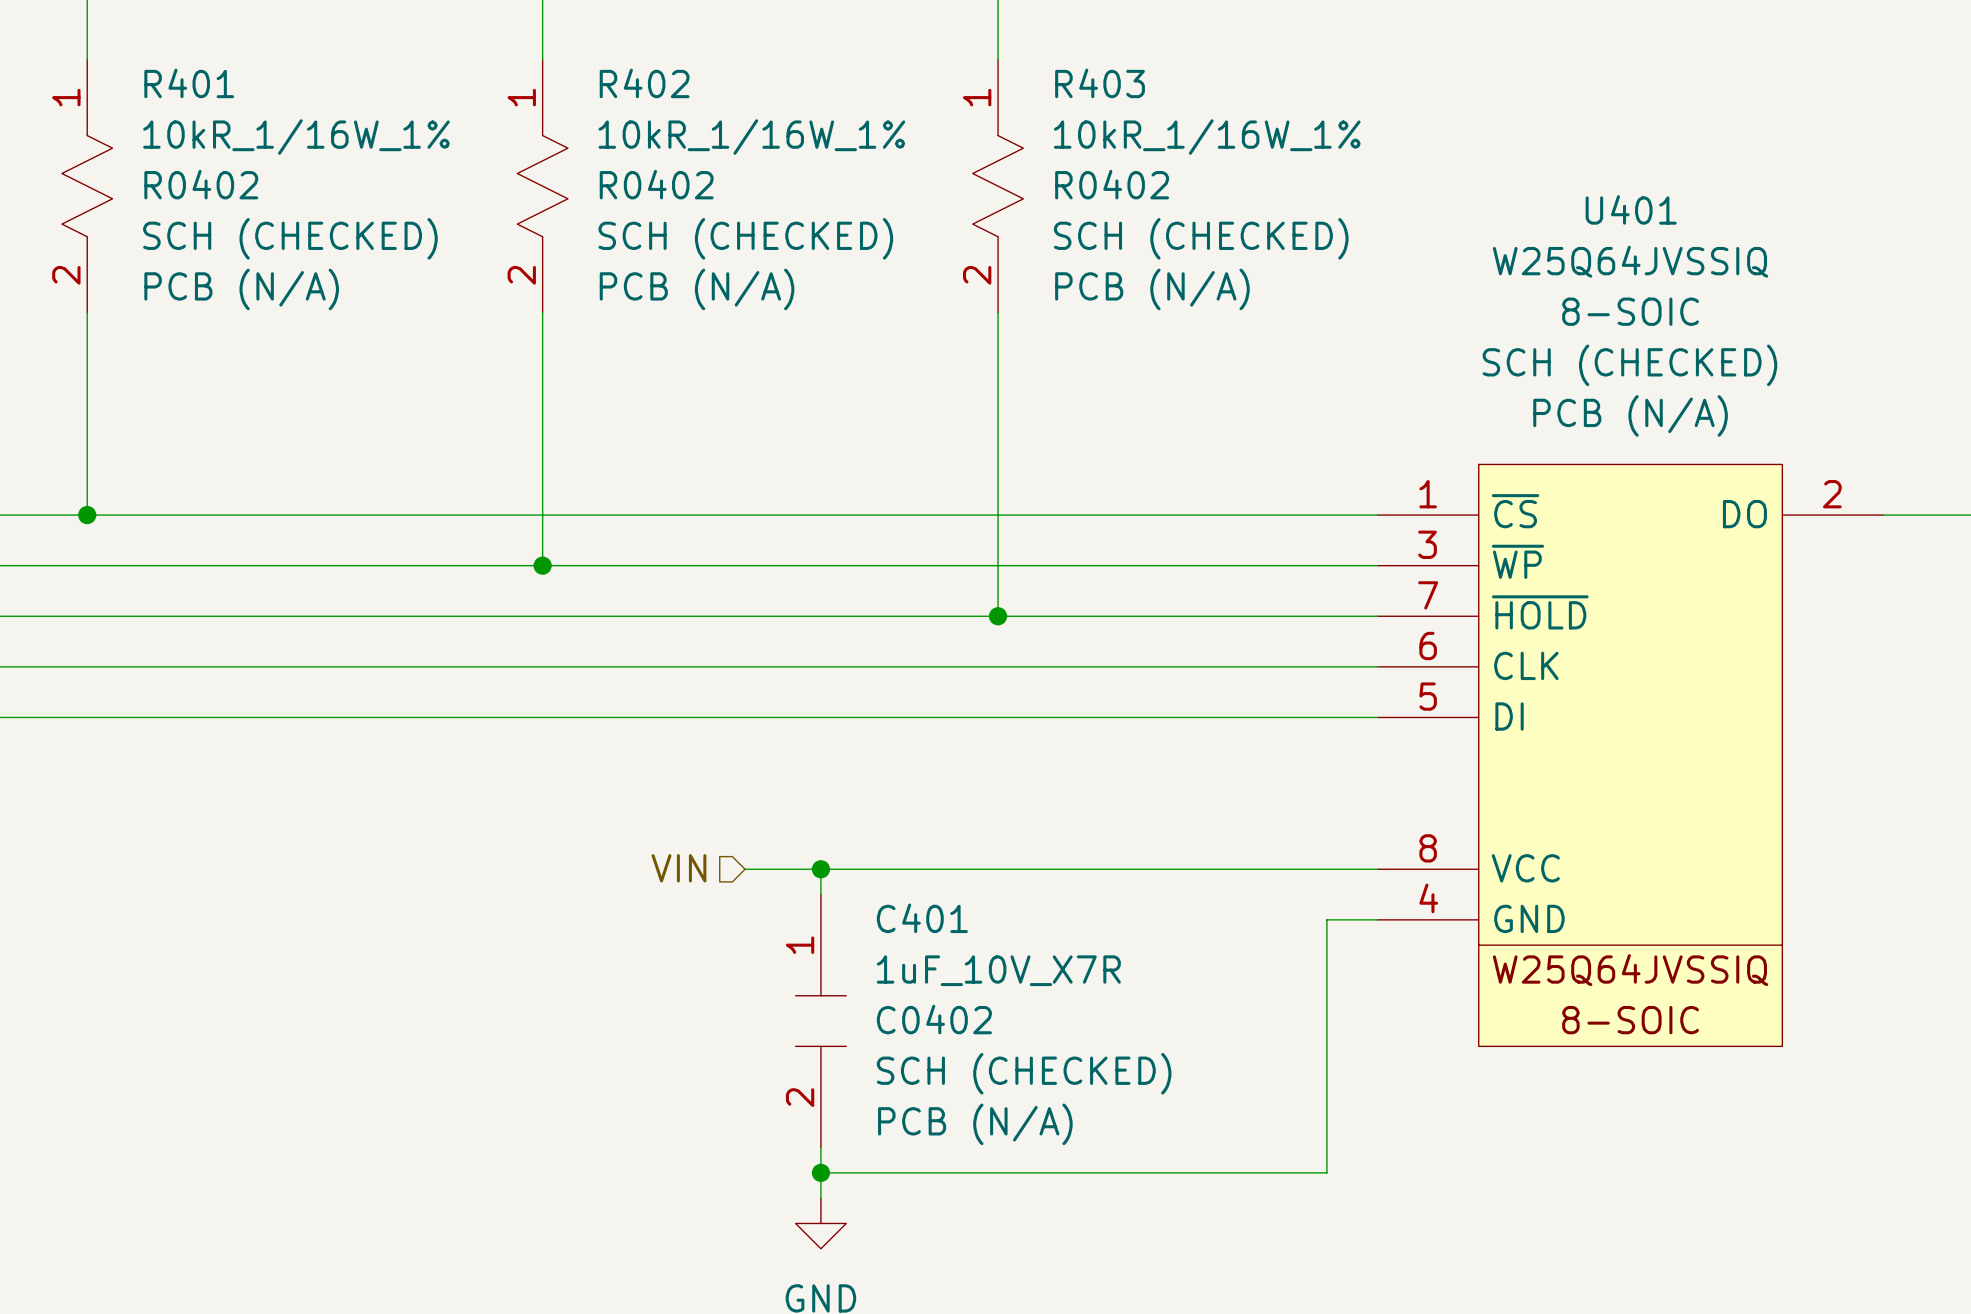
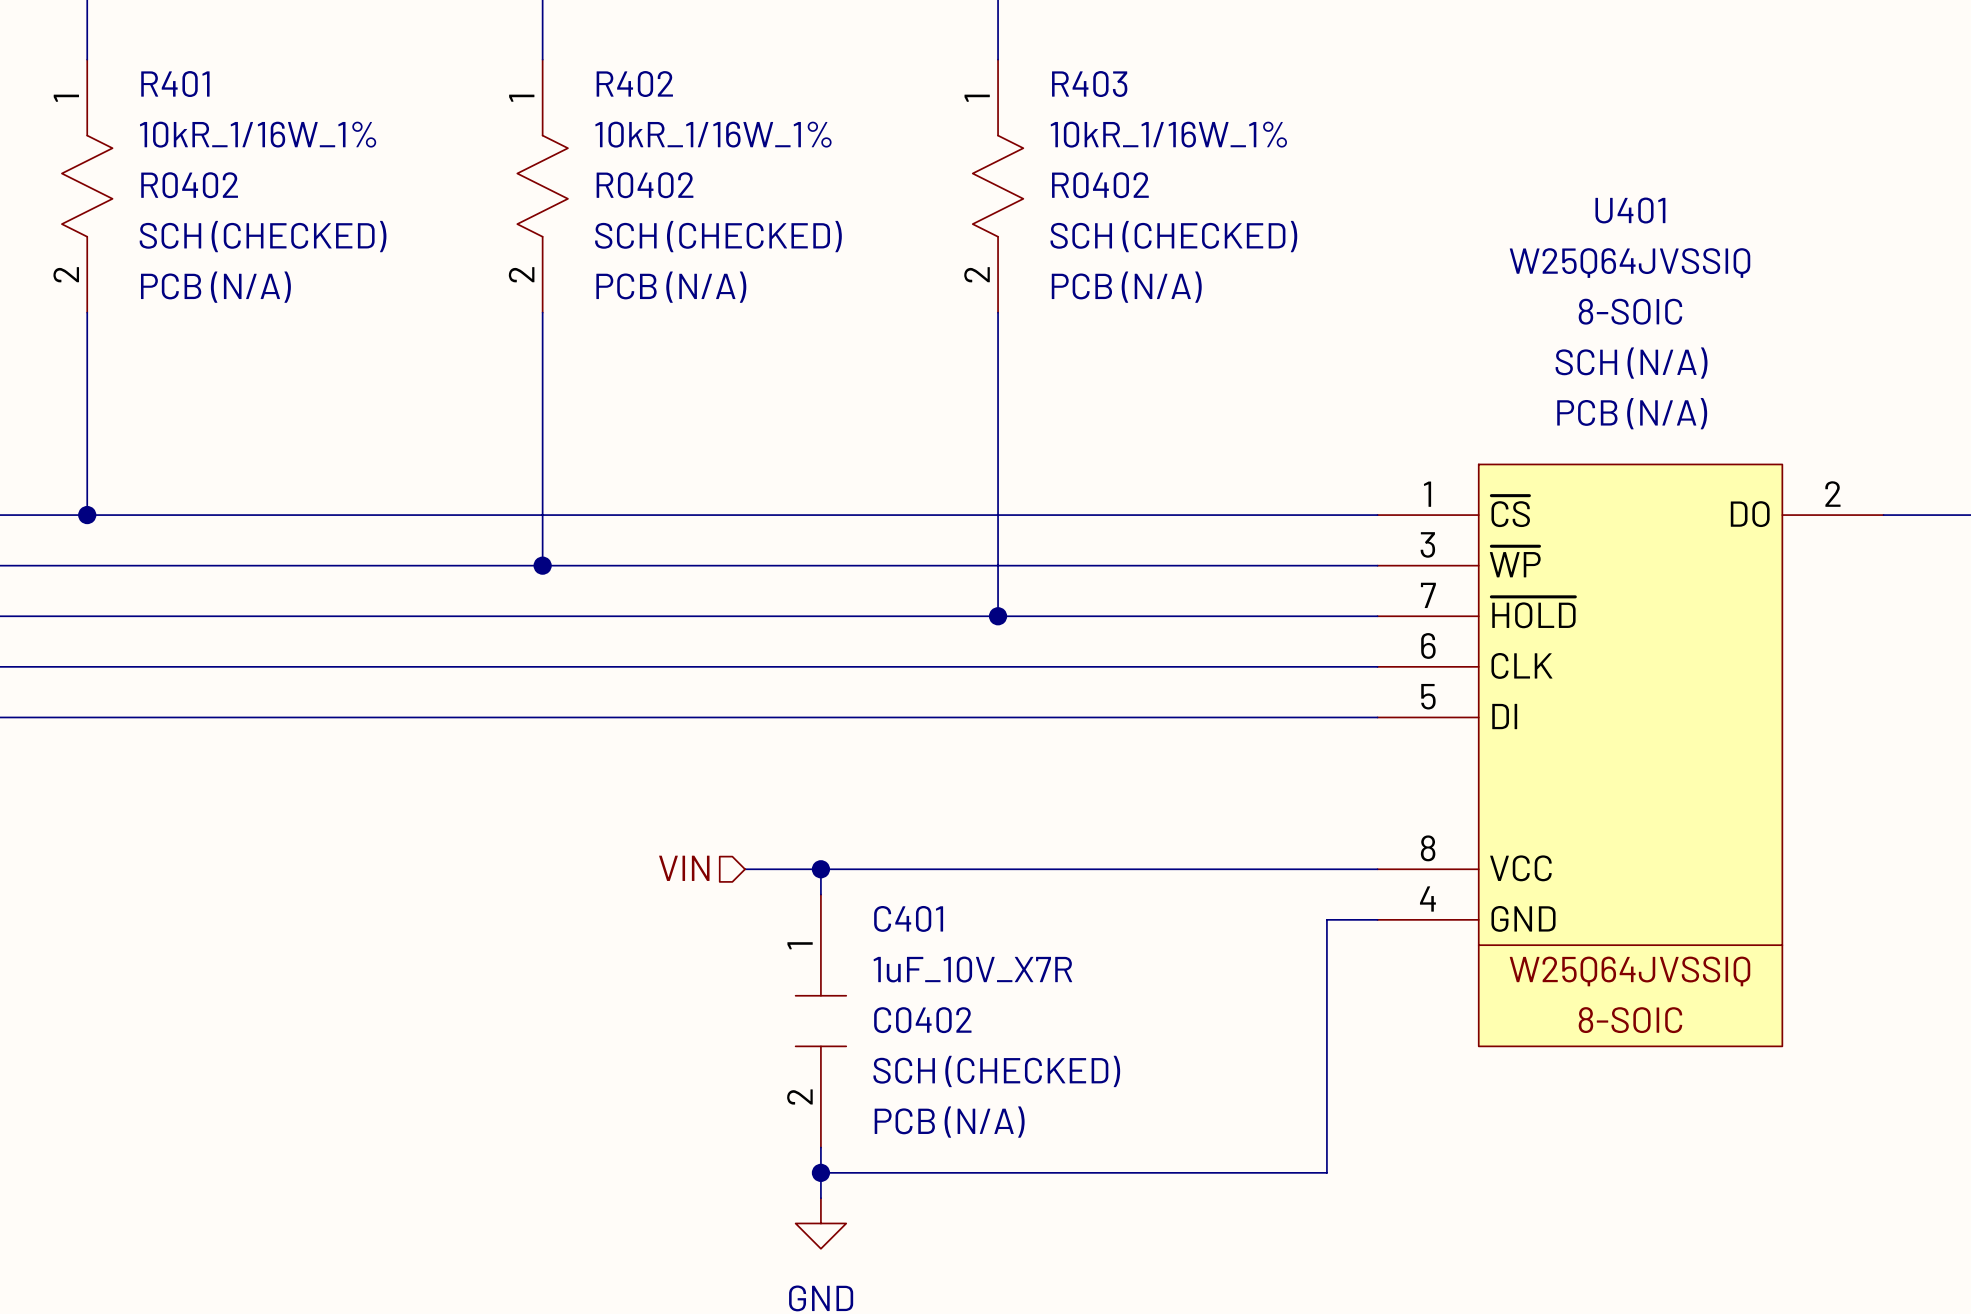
U401 text: SCH (CHECKED) (1629, 365) -> SCH (N/A) (1631, 363)

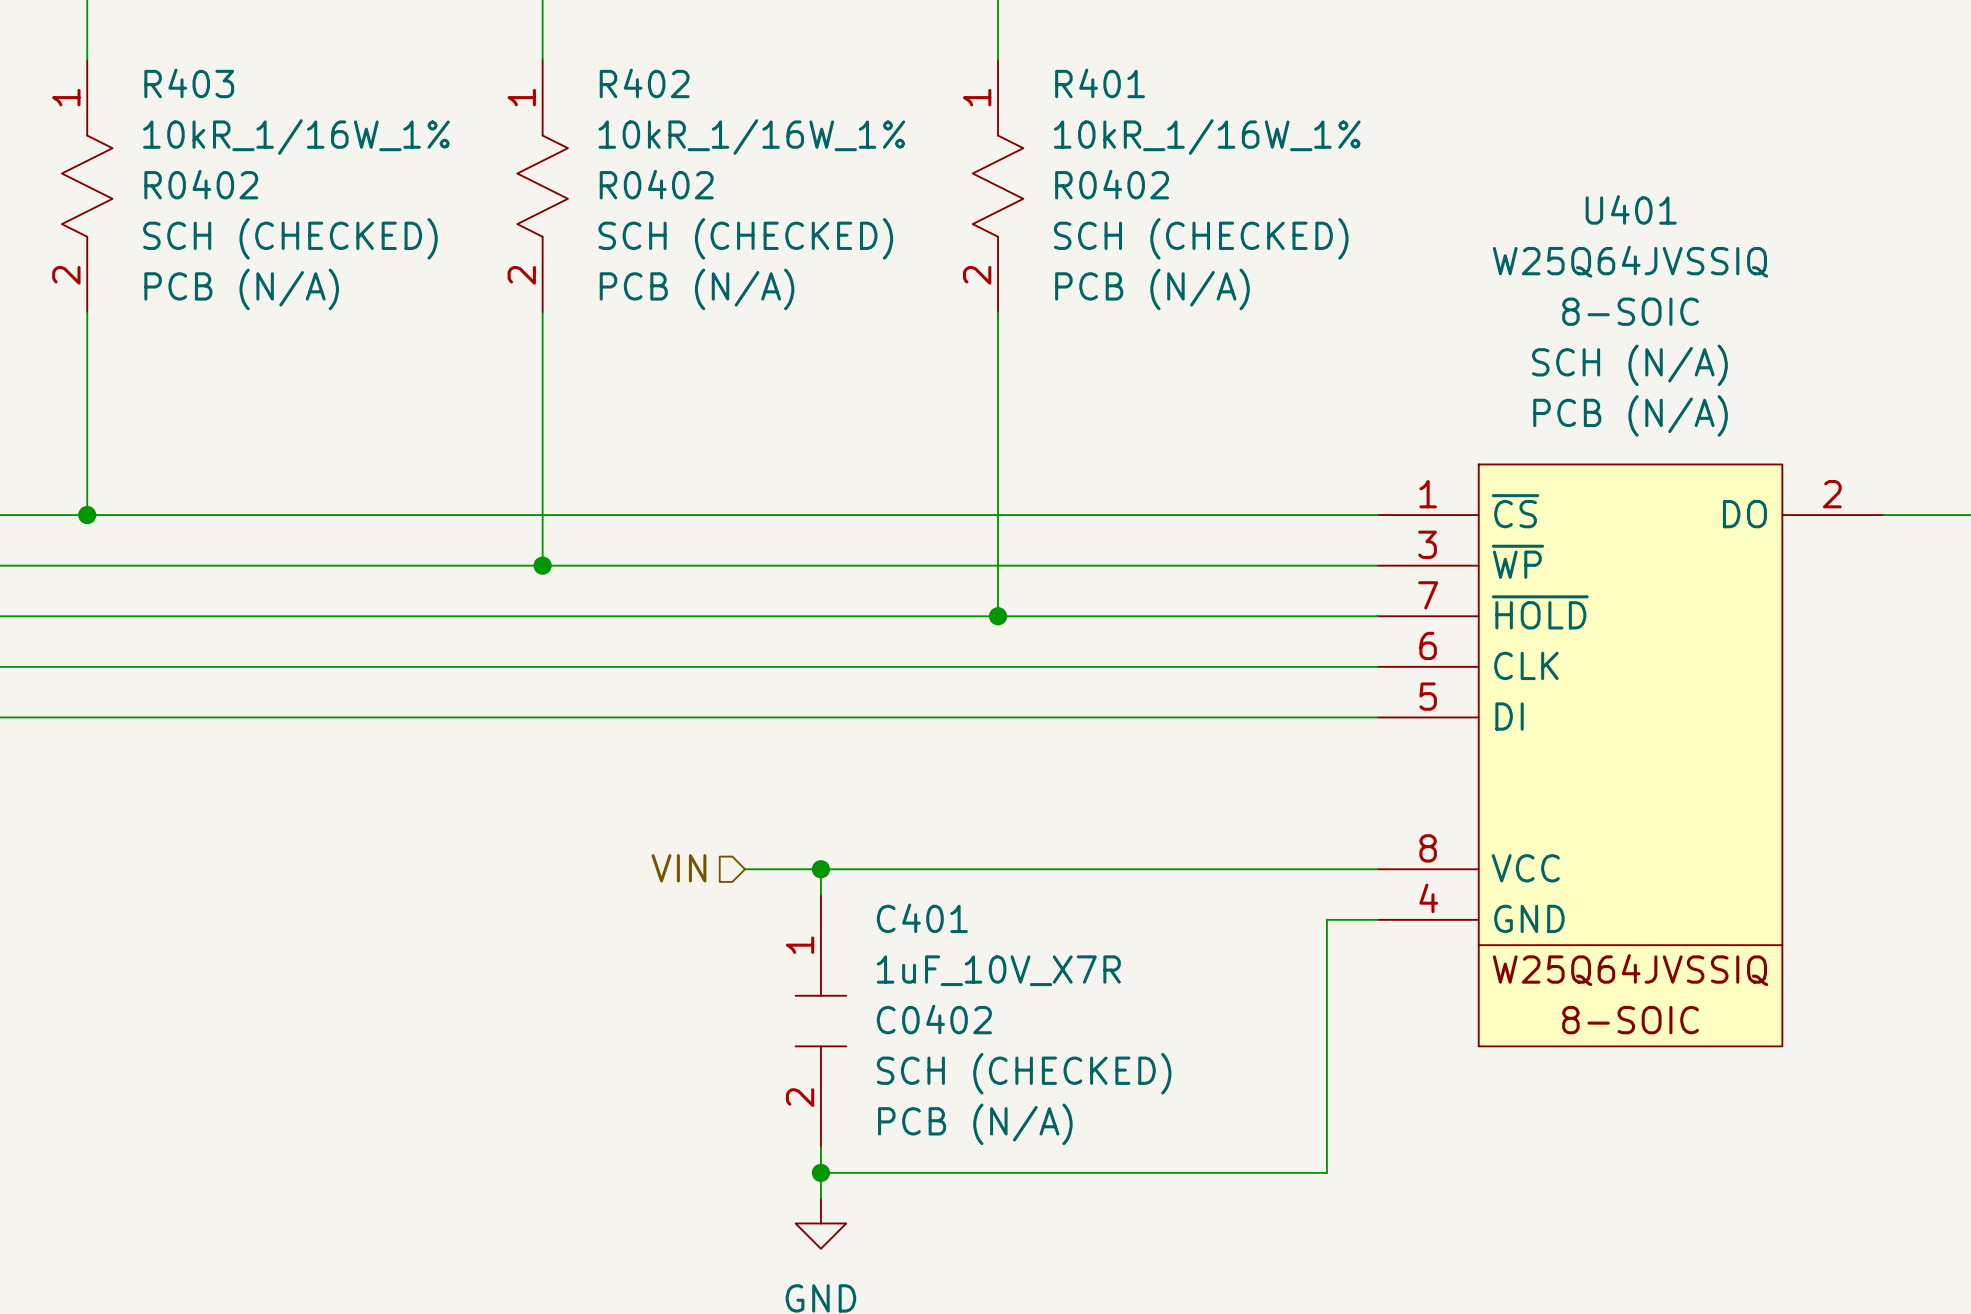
R401 name: R401 (175, 84) -> R403 (189, 83)
R403 name: R403 (1089, 84) -> R401 (1100, 83)

